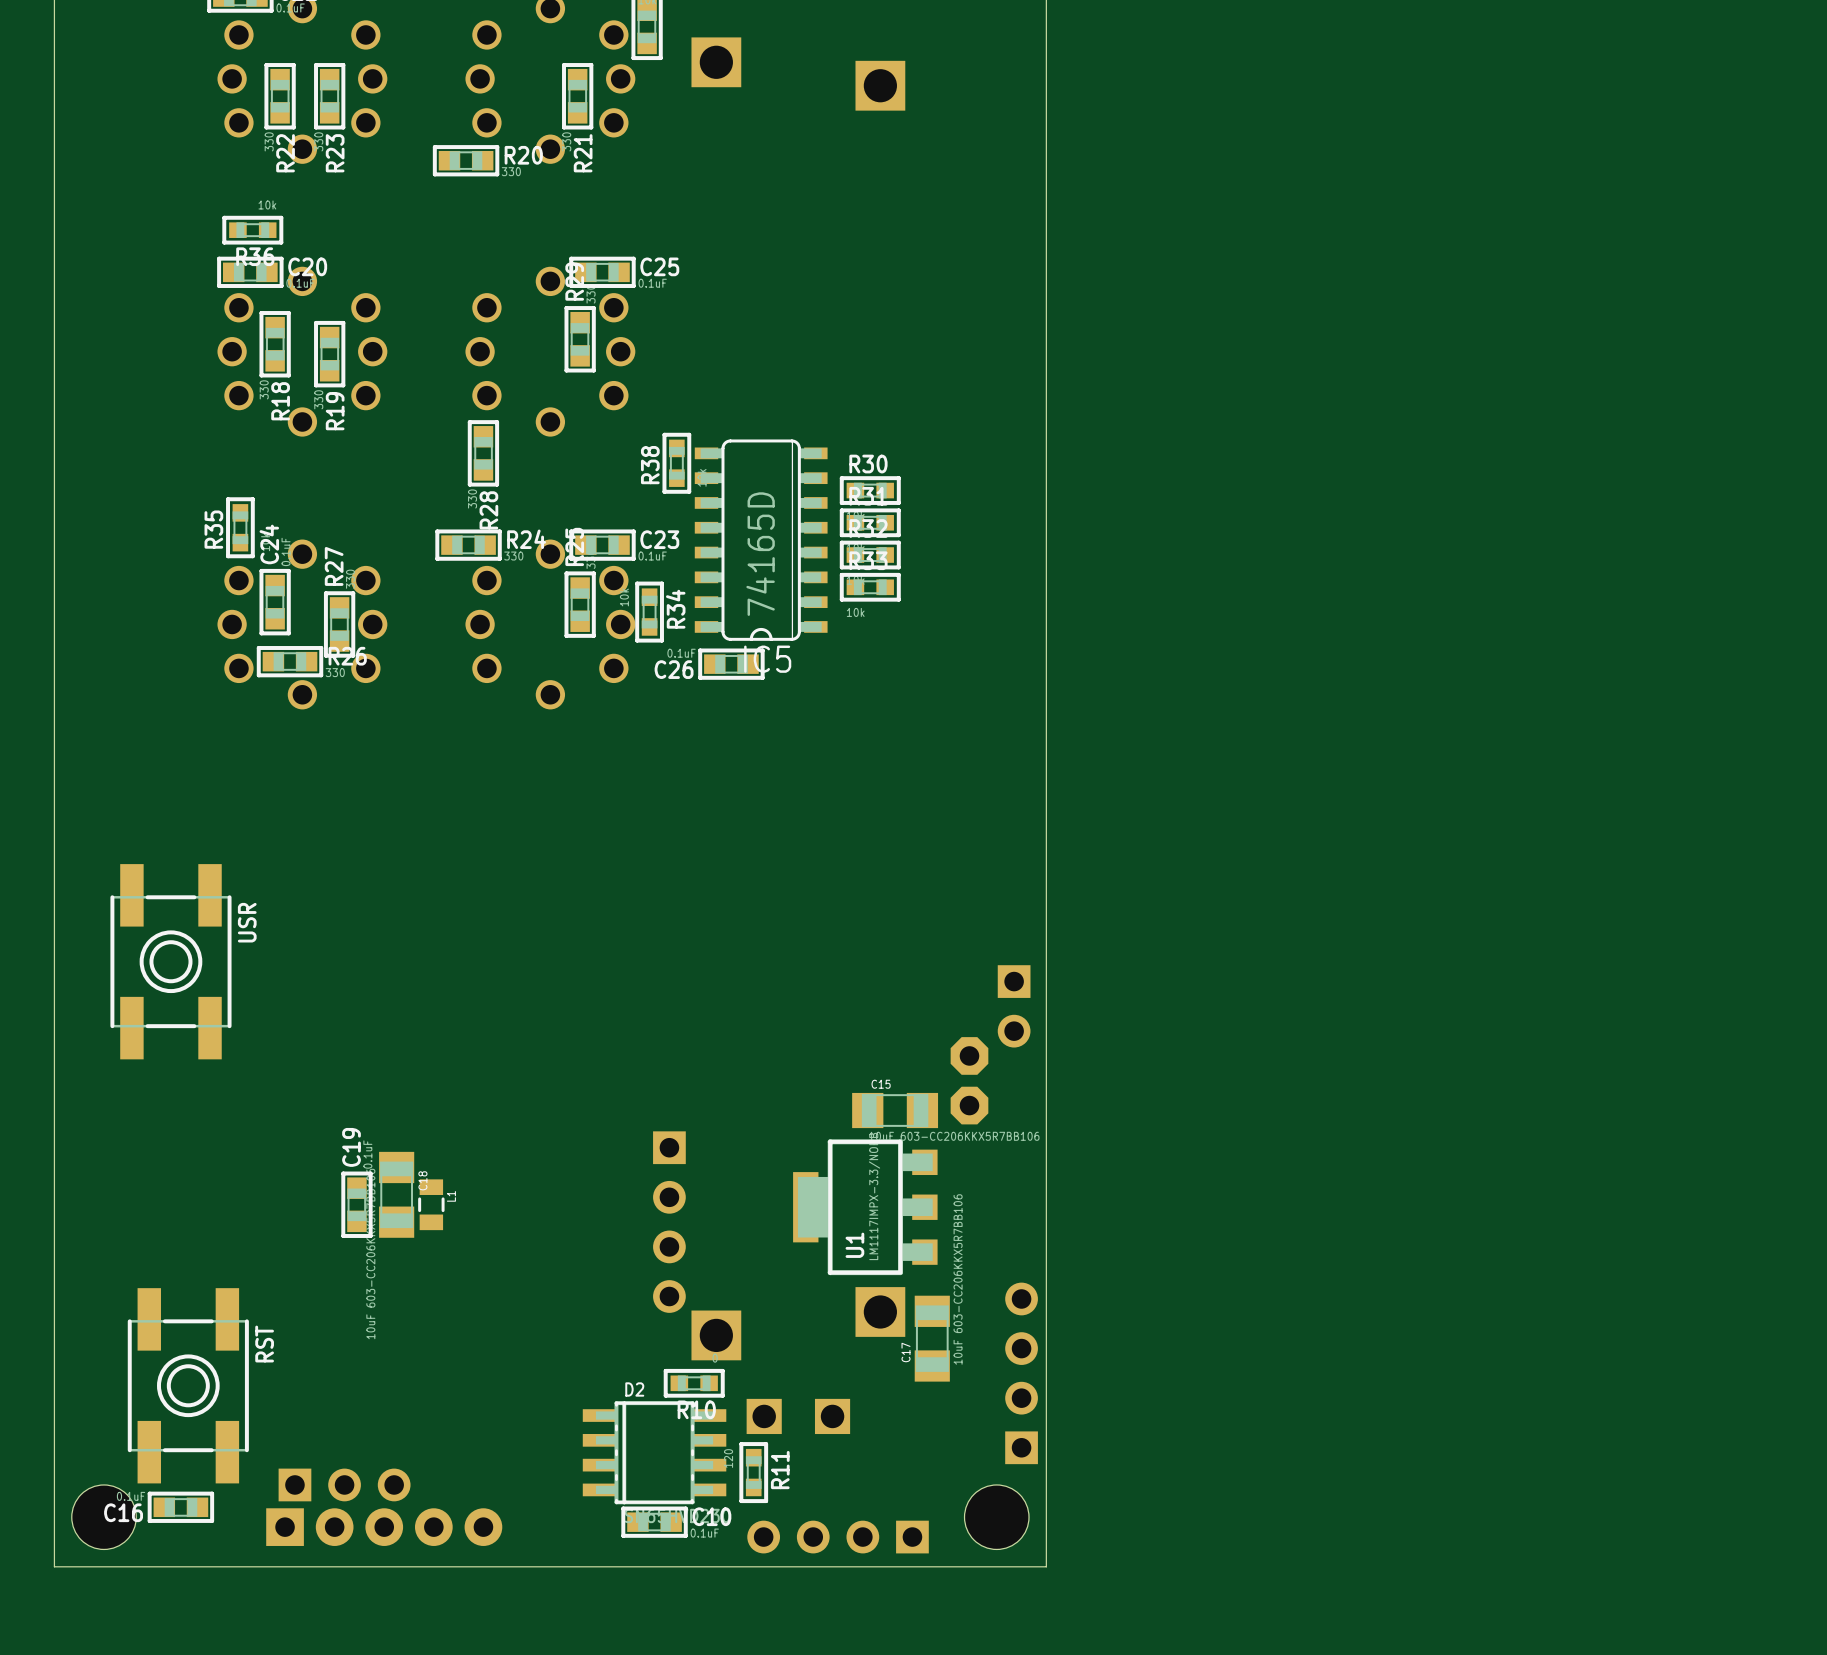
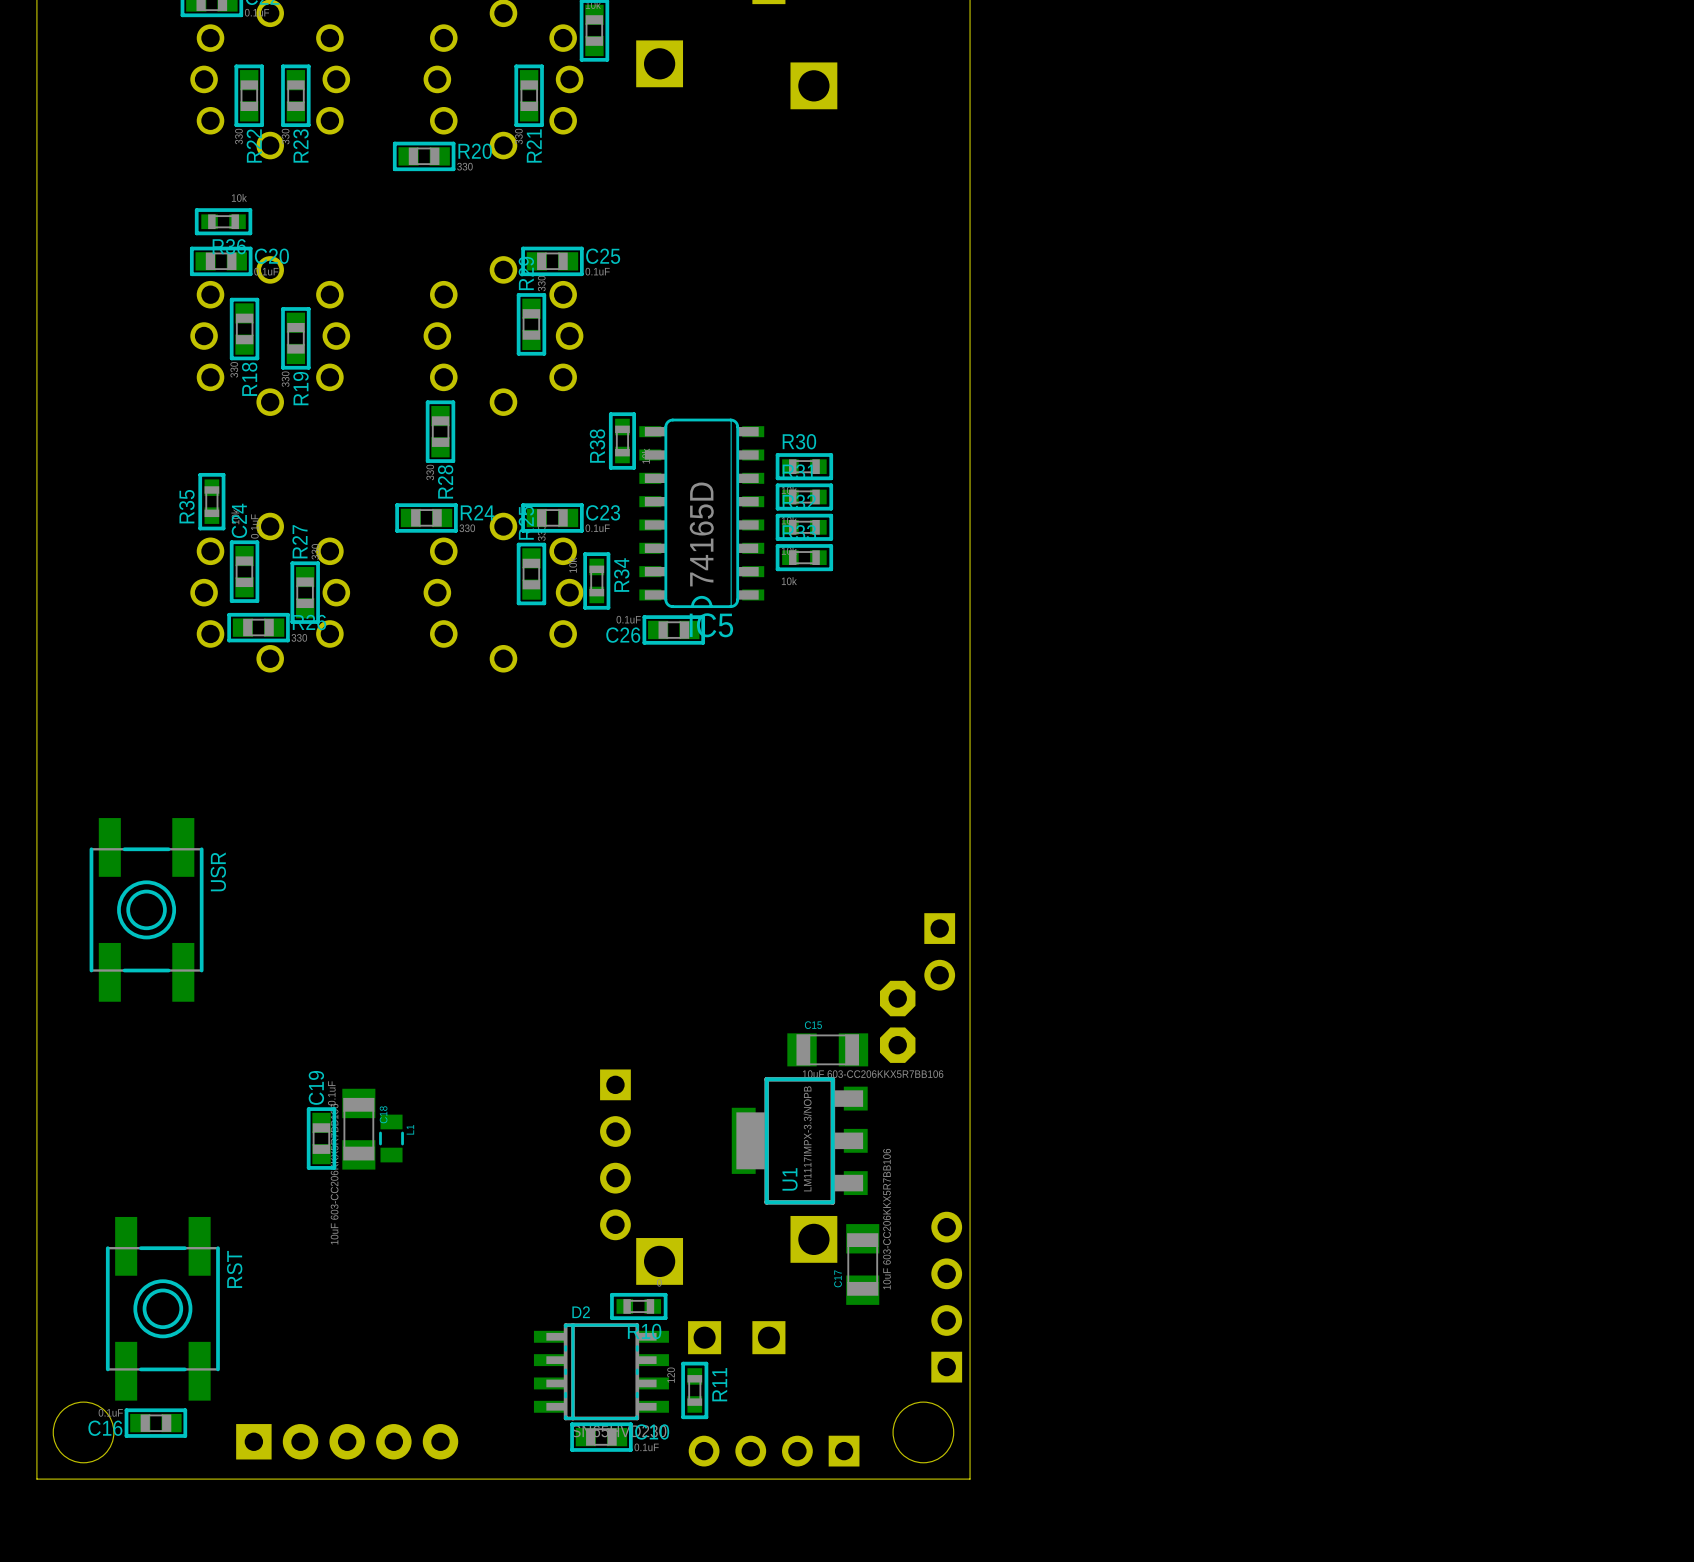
part: (344, 1484) -> none

